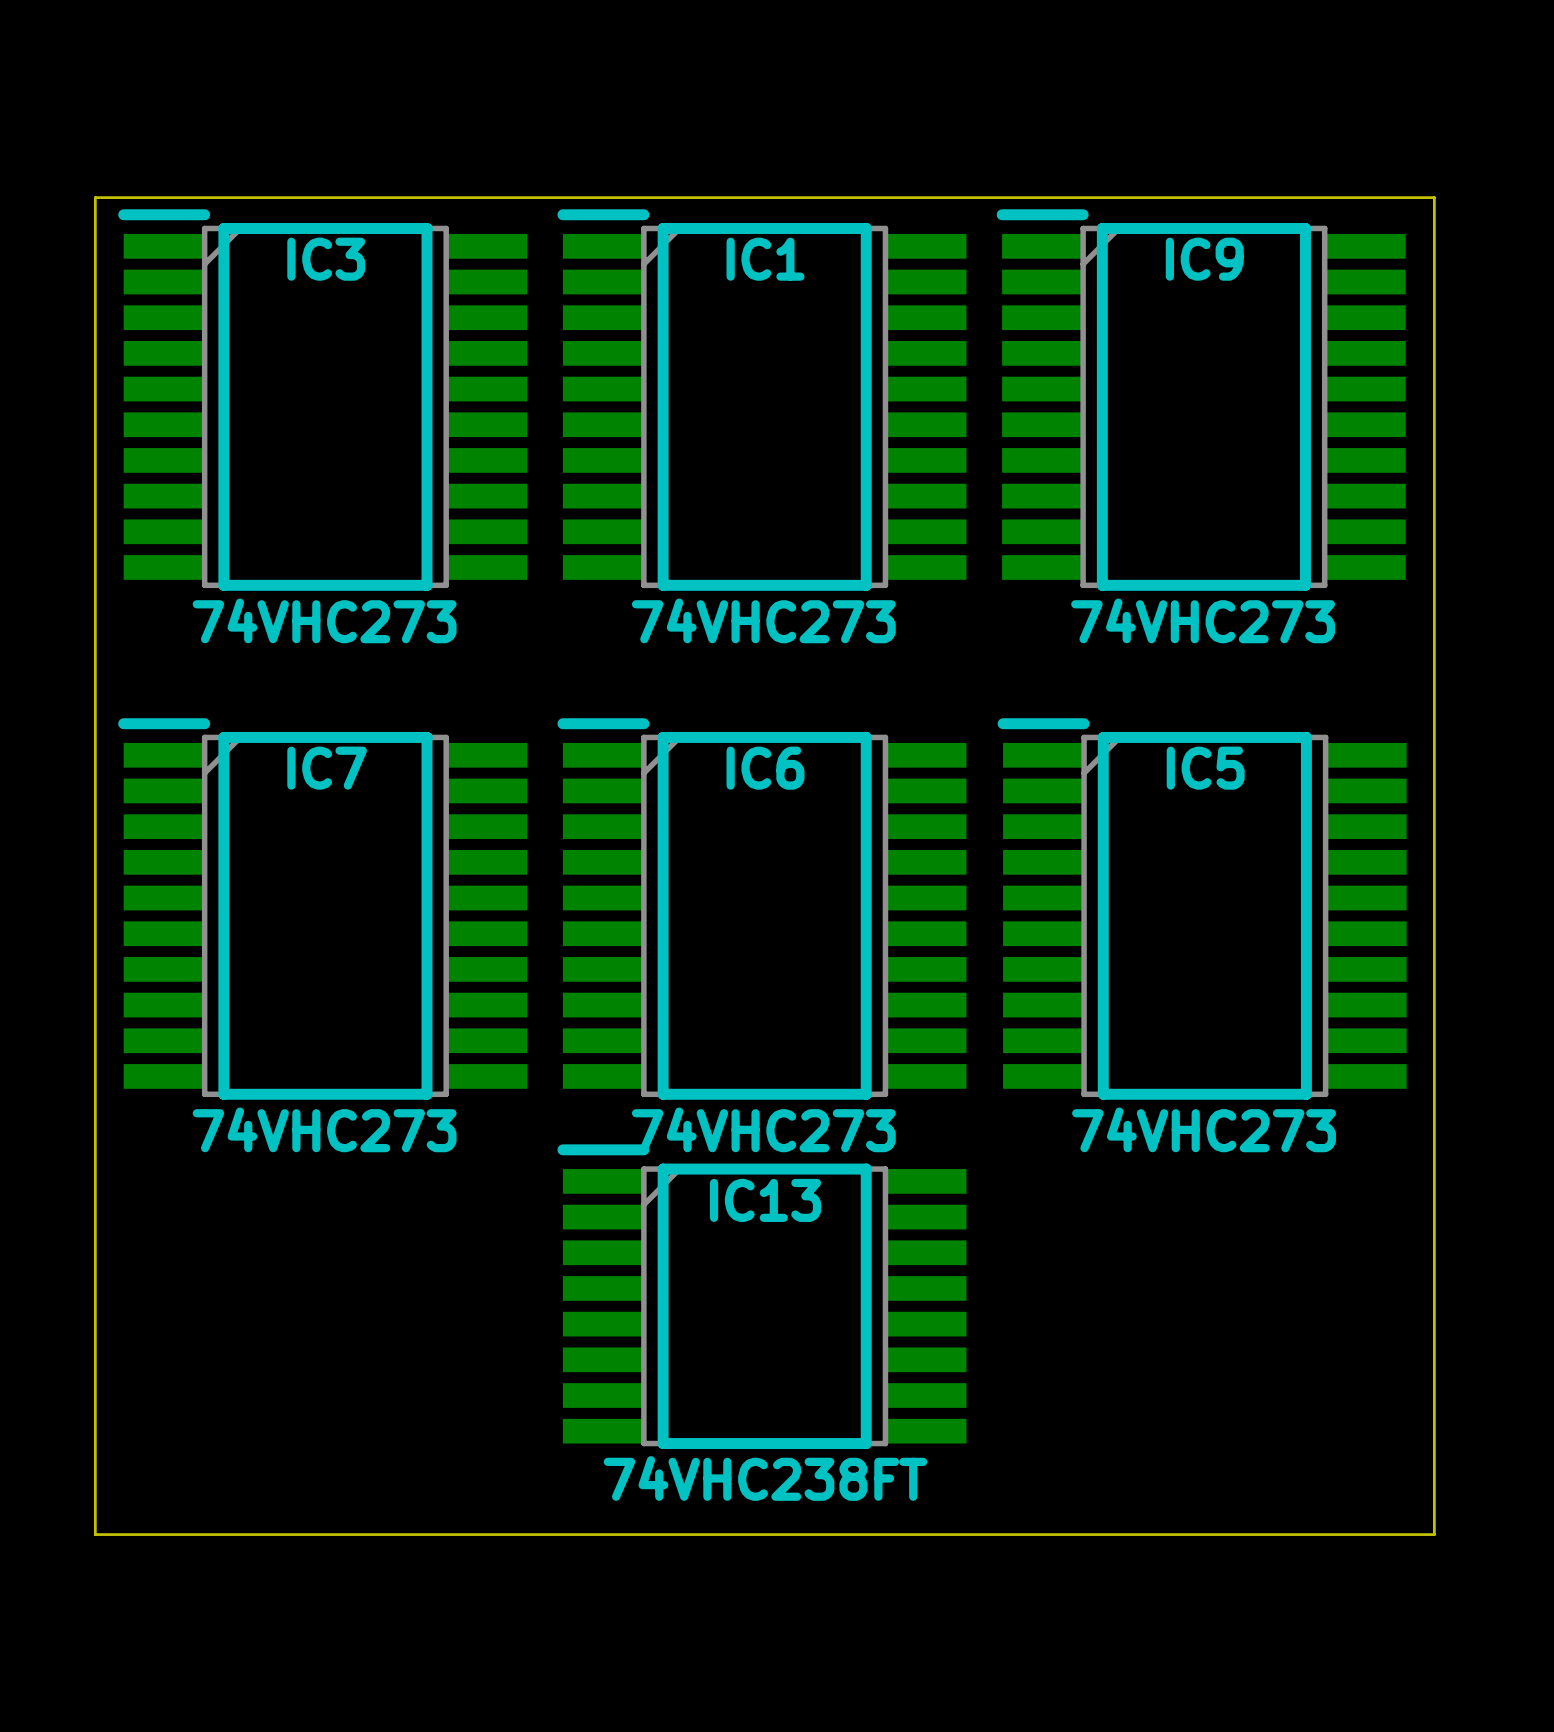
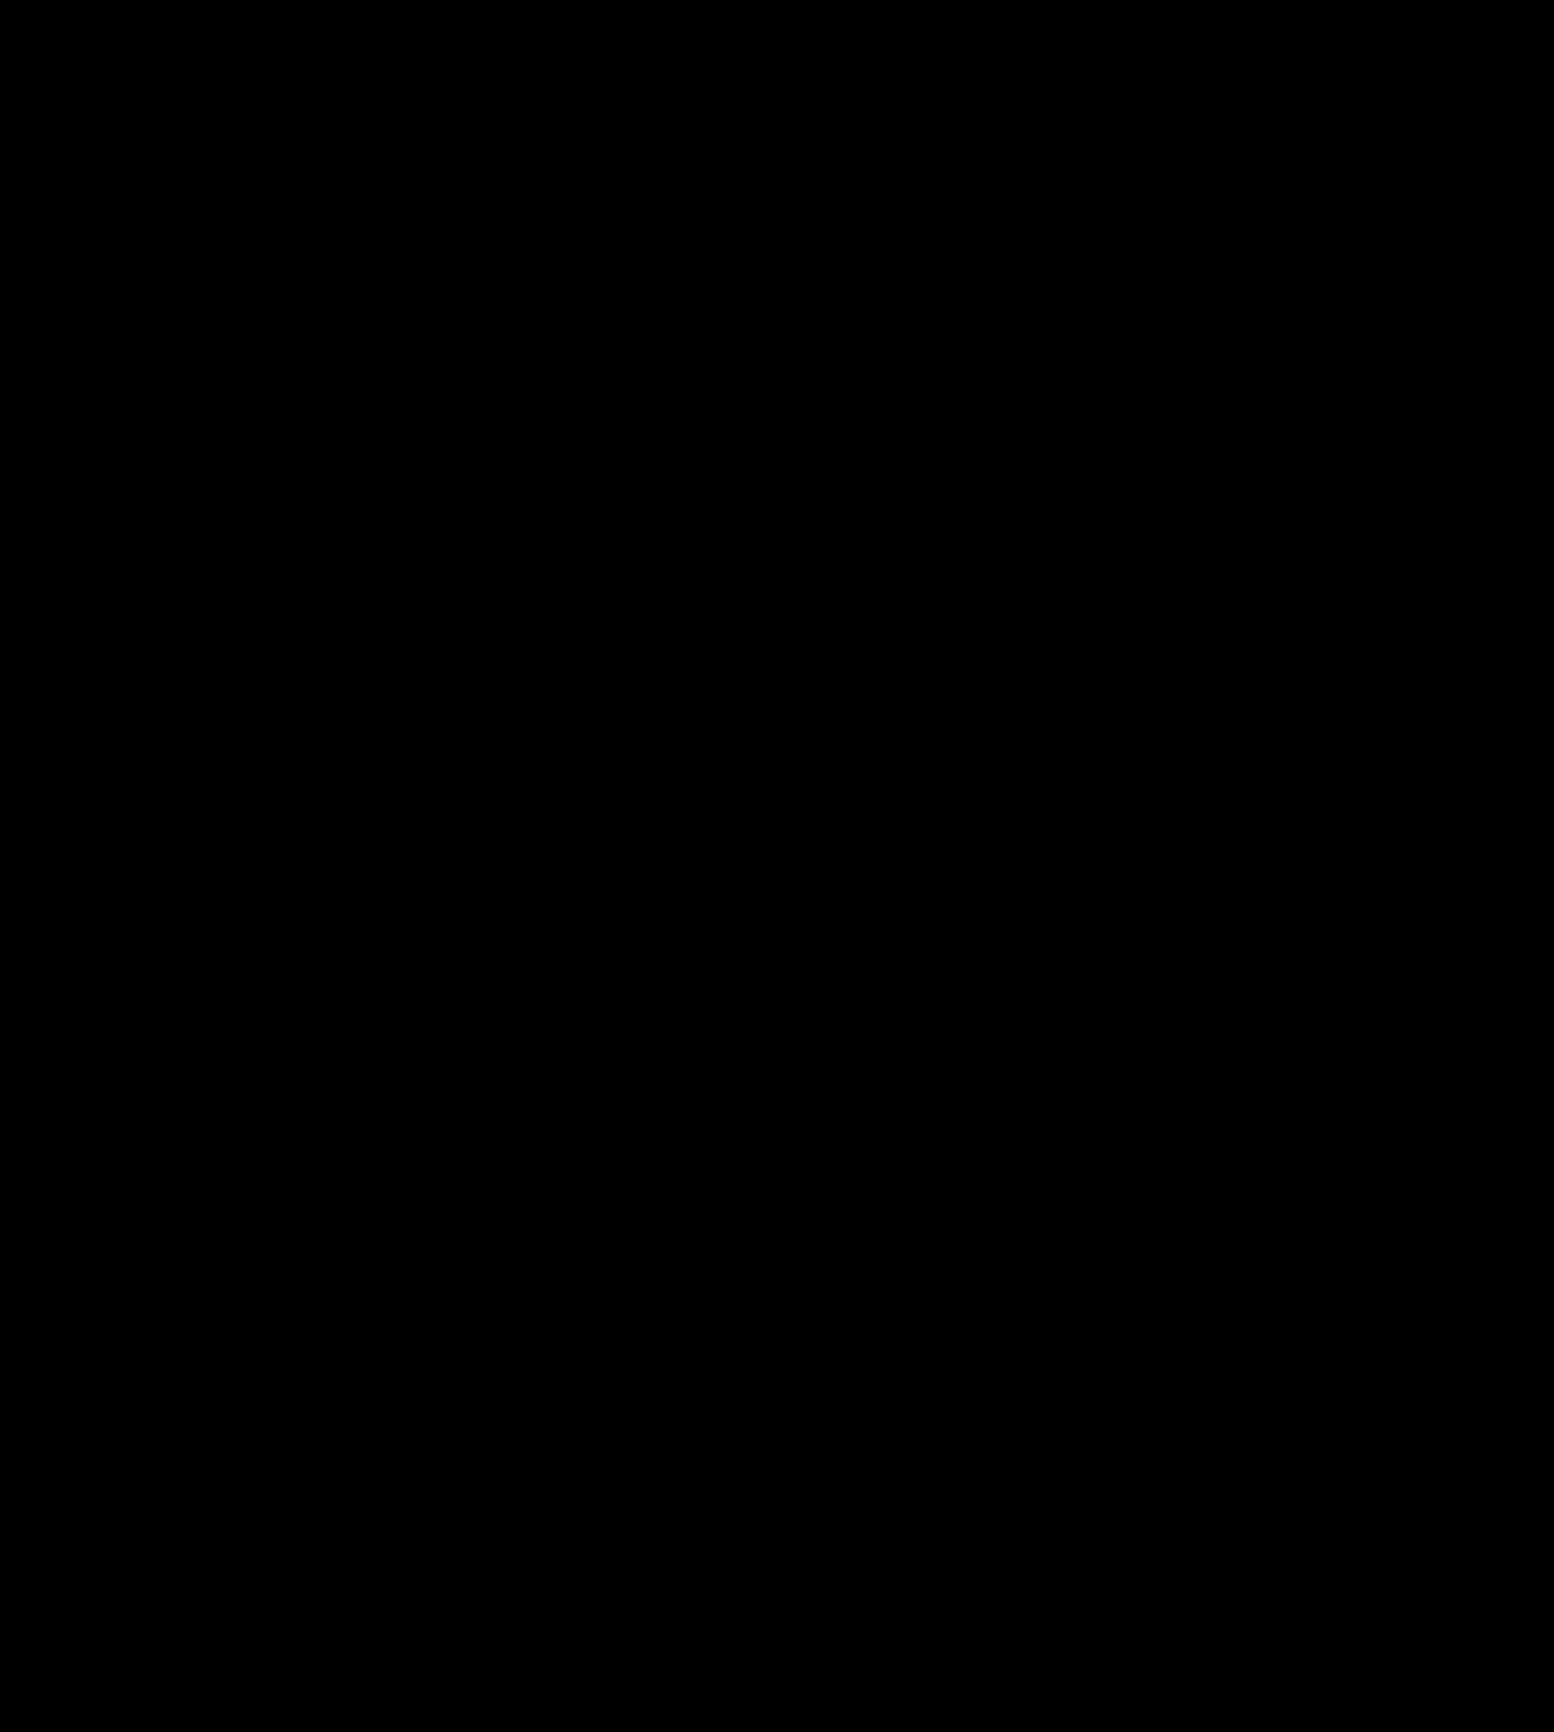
board edge: (1434, 197) (95, 197) (95, 1534) (1434, 1534) (1434, 197) -> none
IC3: (322, 400) -> none
IC1: (761, 400) -> none
IC9: (1201, 400) -> none
IC7: (322, 909) -> none
IC6: (761, 909) -> none
IC5: (1202, 909) -> none
IC13: (761, 1296) -> none

